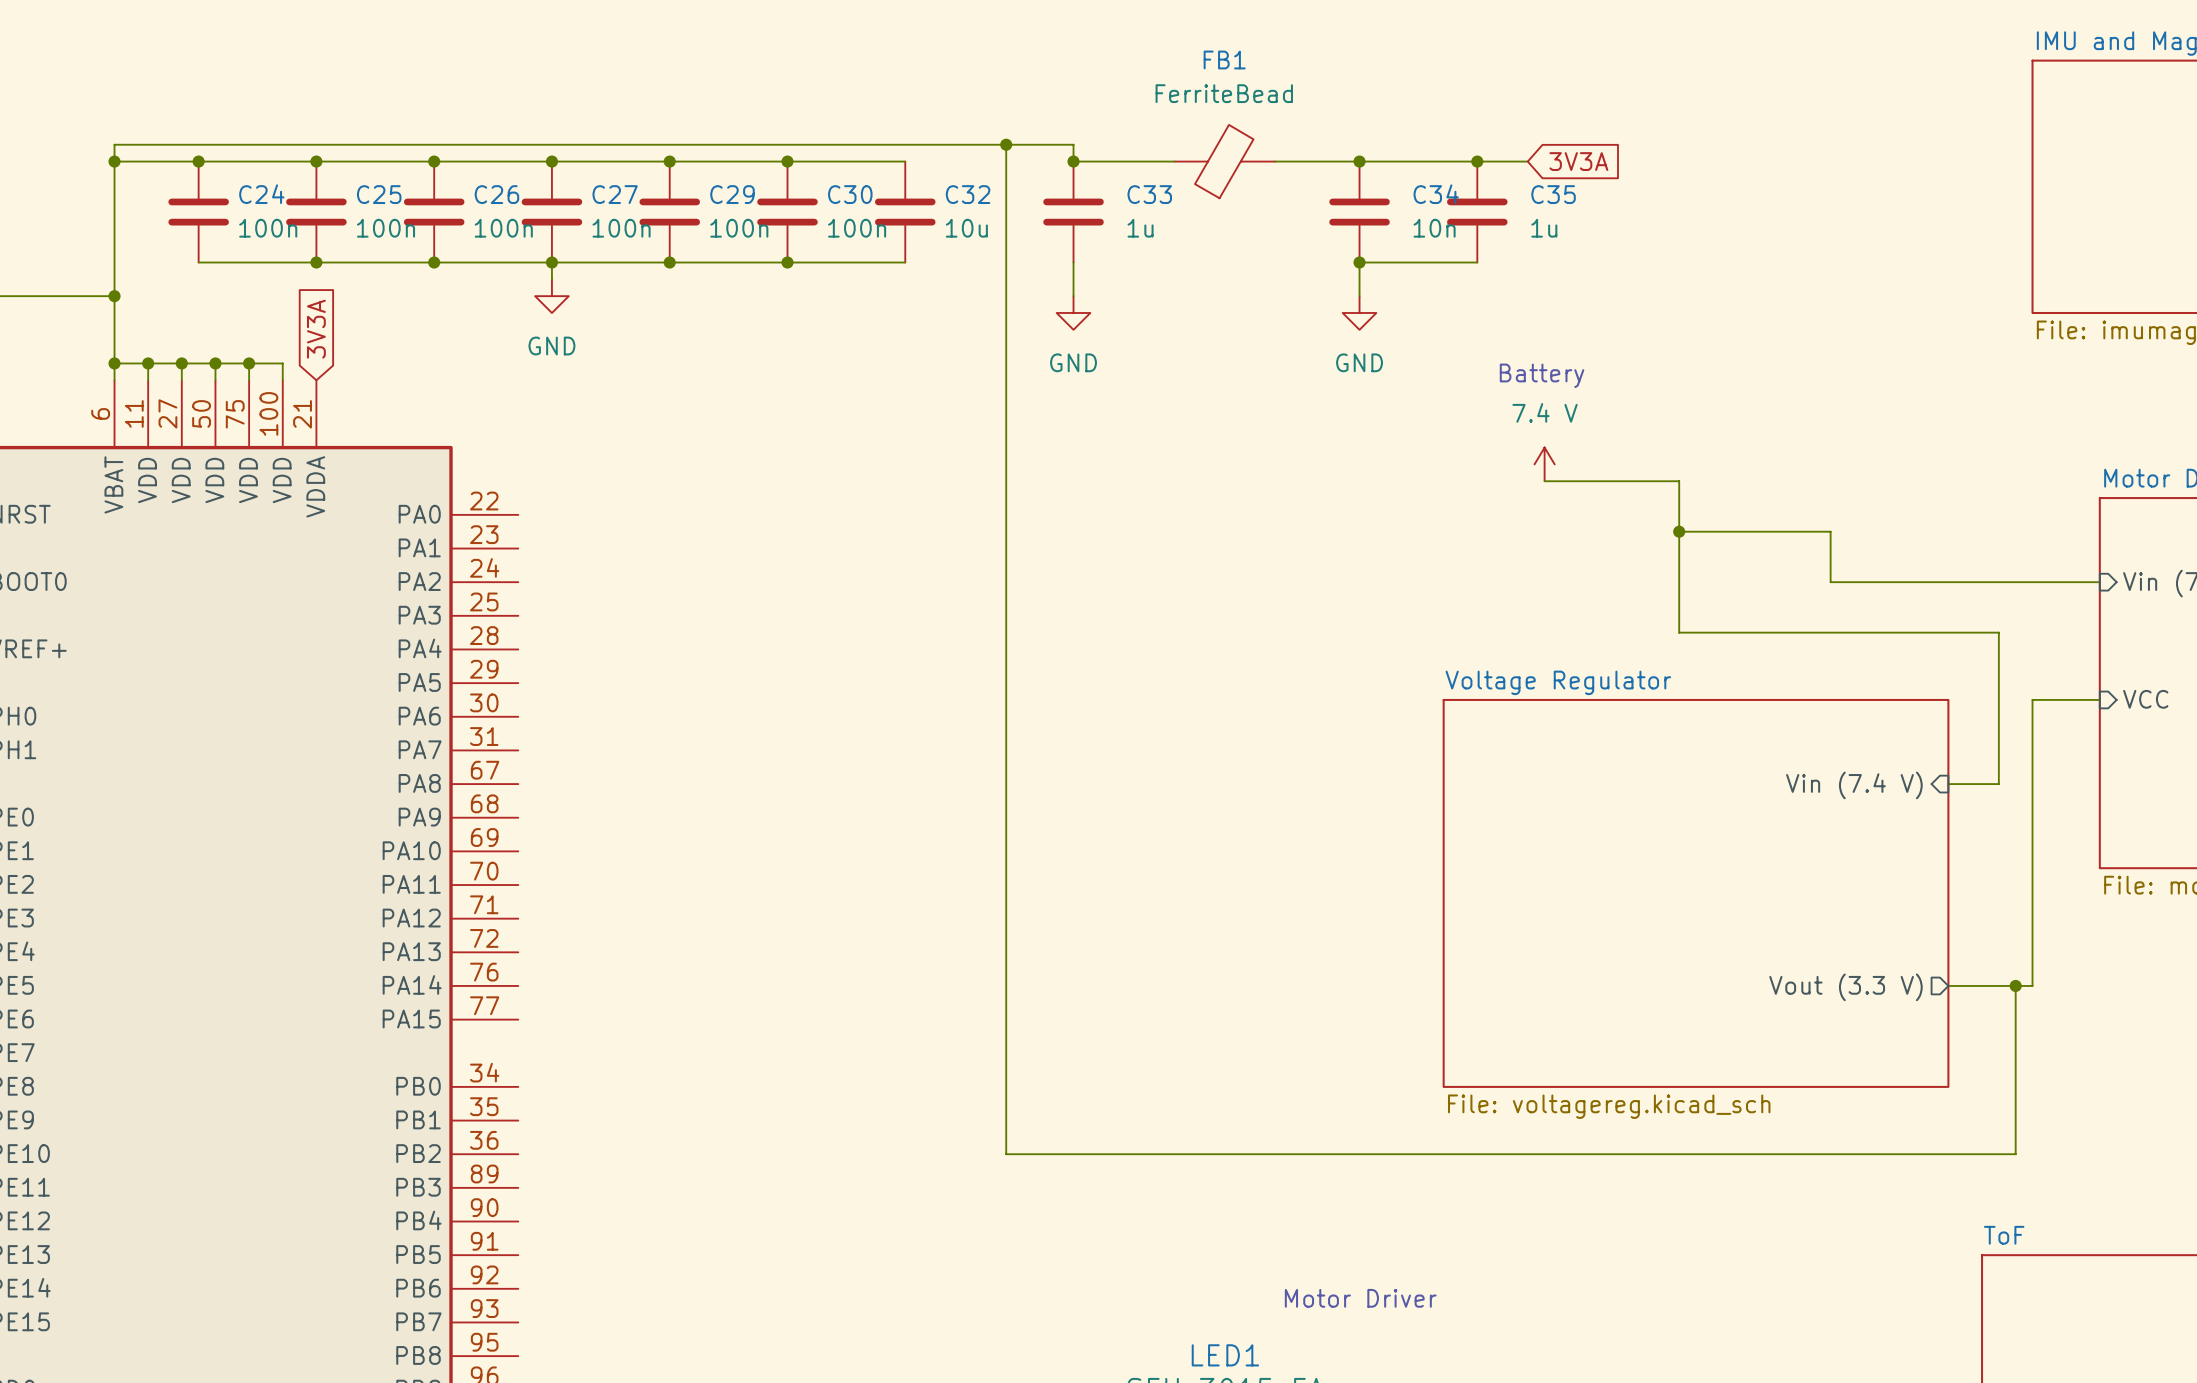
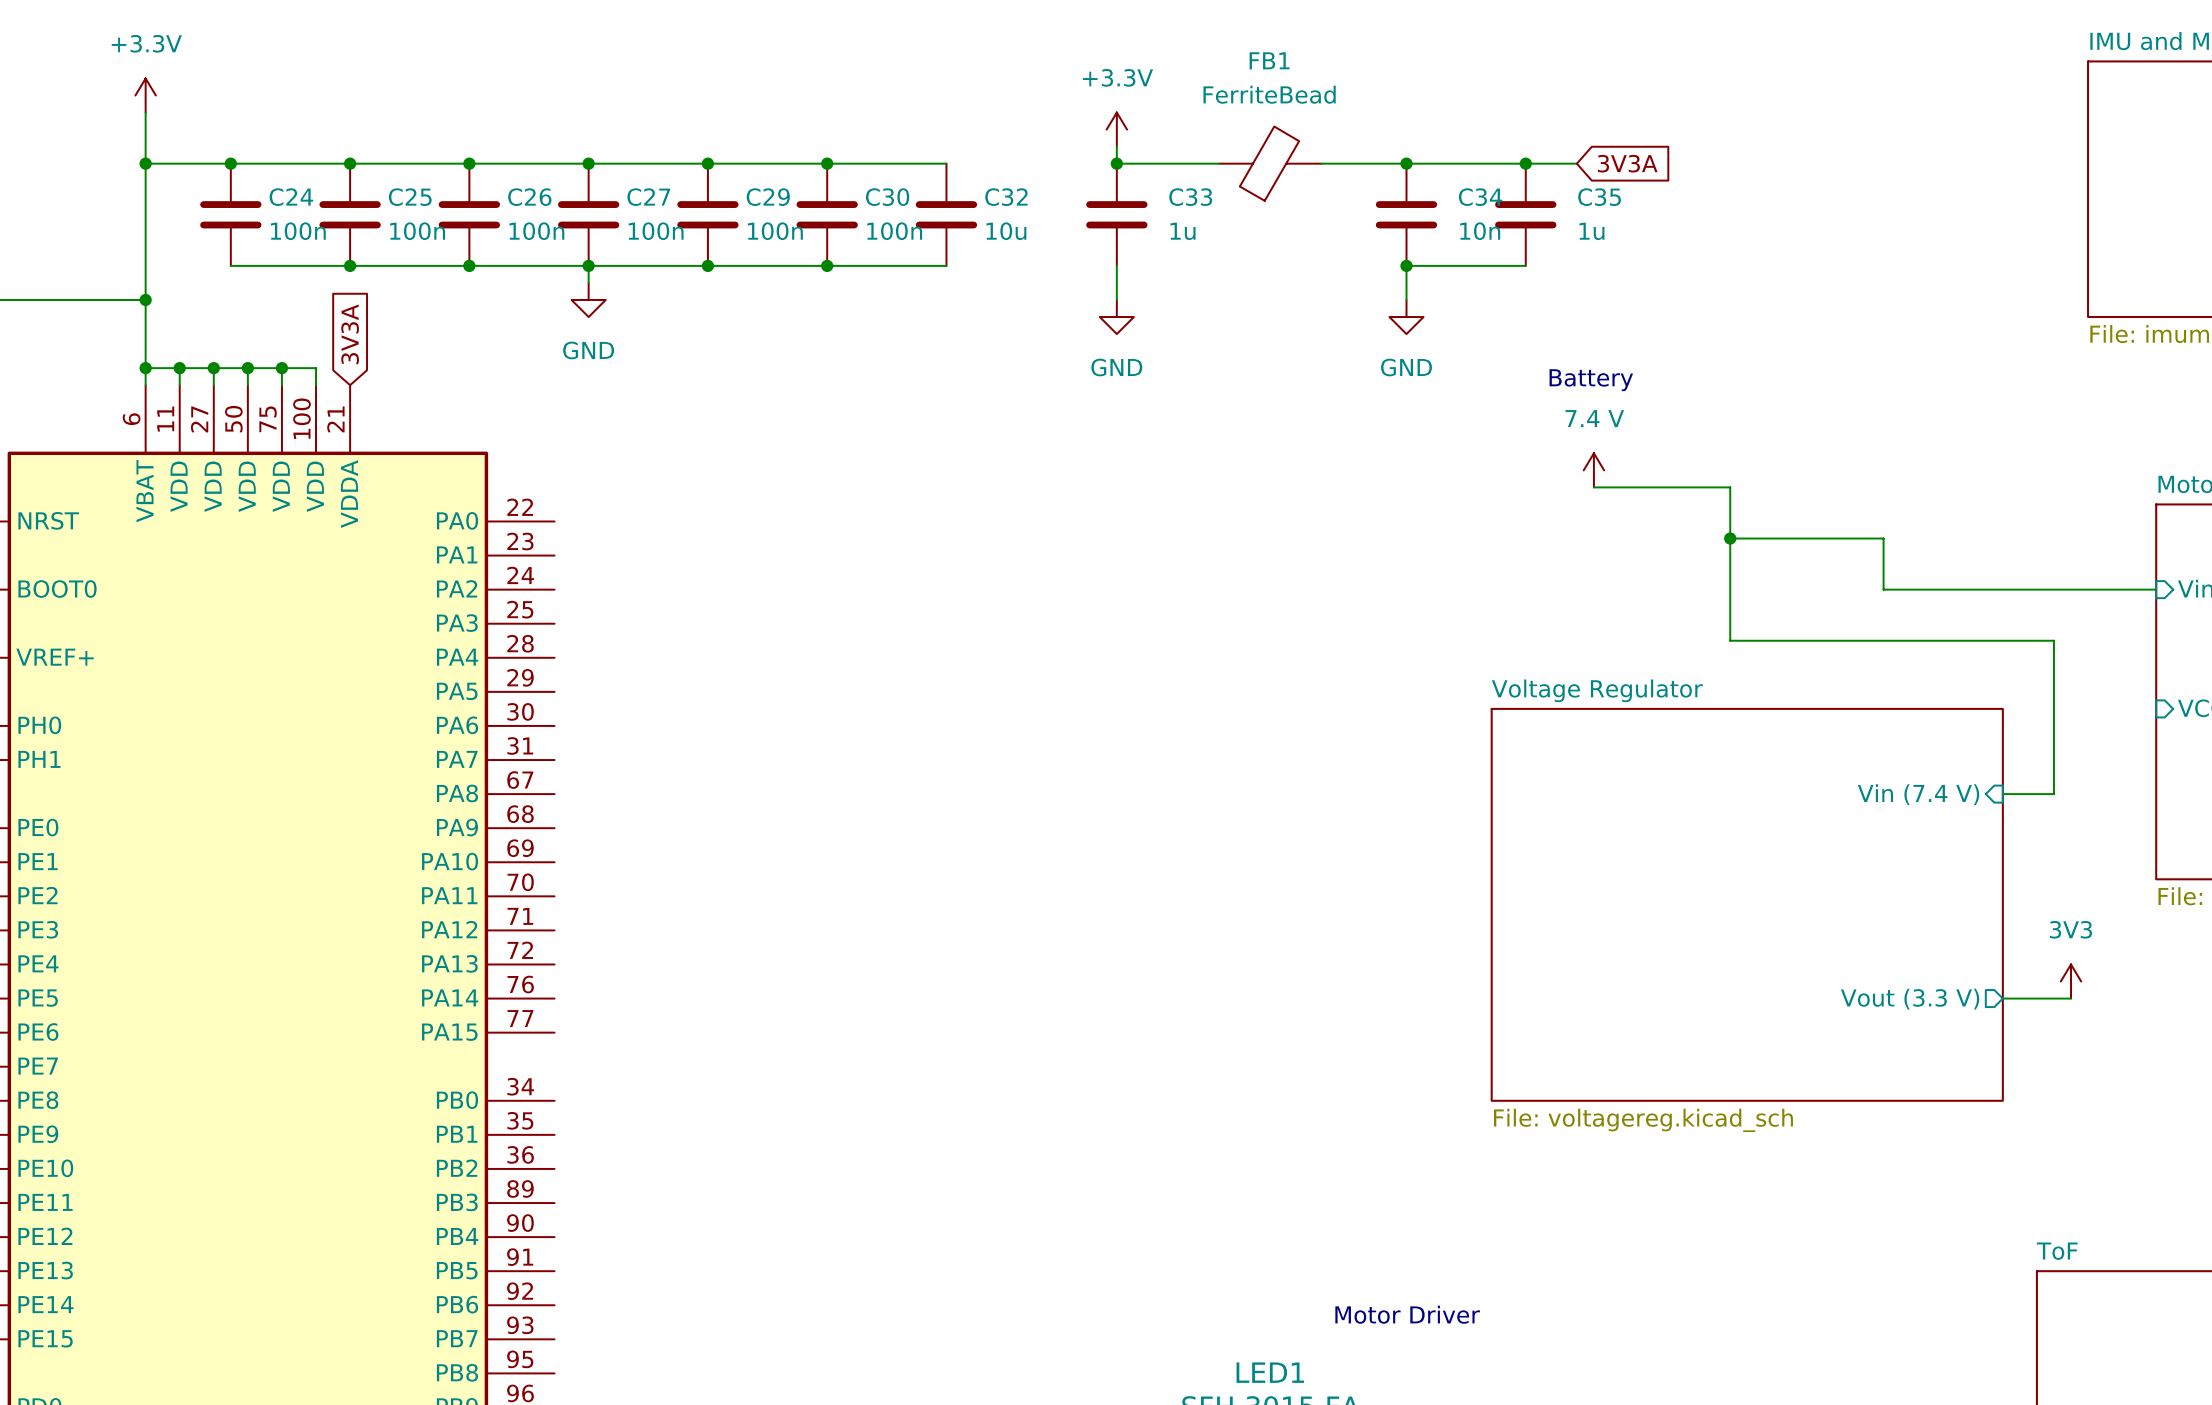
power symbol: none -> +3.3V (145, 95)
power symbol: none -> +3.3V (1116, 129)
wire: (114, 144) (1073, 144) -> (145, 146) (145, 112)
wire: (1006, 144) (1006, 1154) (2015, 1154) (2015, 985) (2032, 985) (2032, 699) (2099, 699) -> none
junction: (1006, 144) -> none
power symbol: none -> 3V3 (2071, 981)
junction: (2015, 985) -> none

